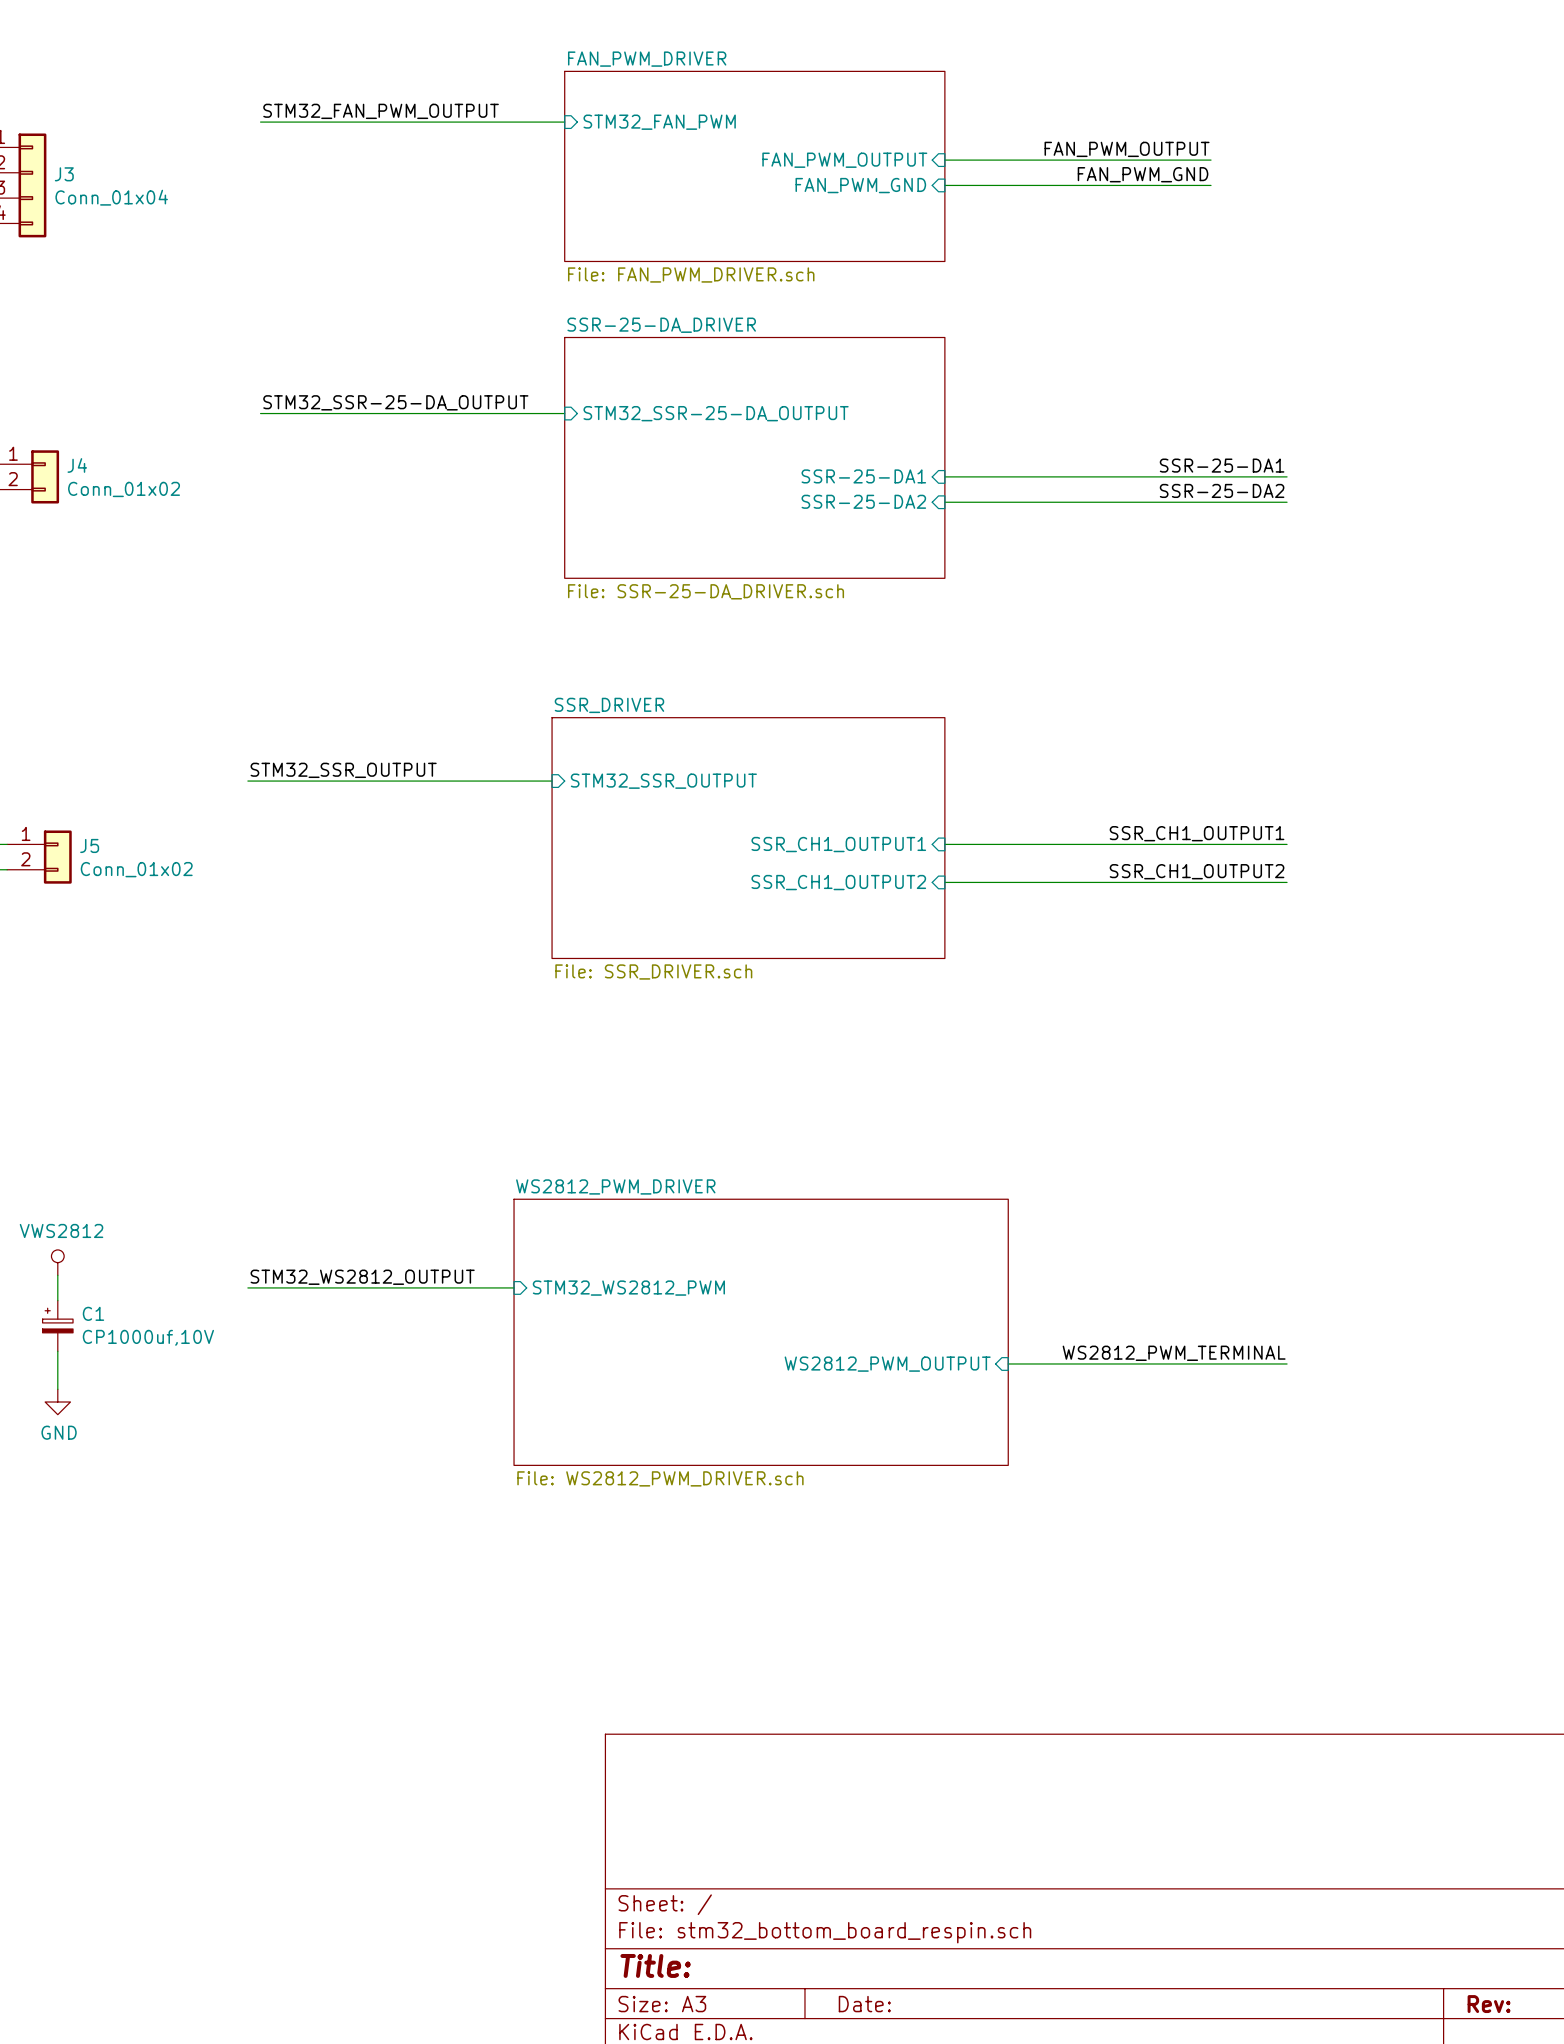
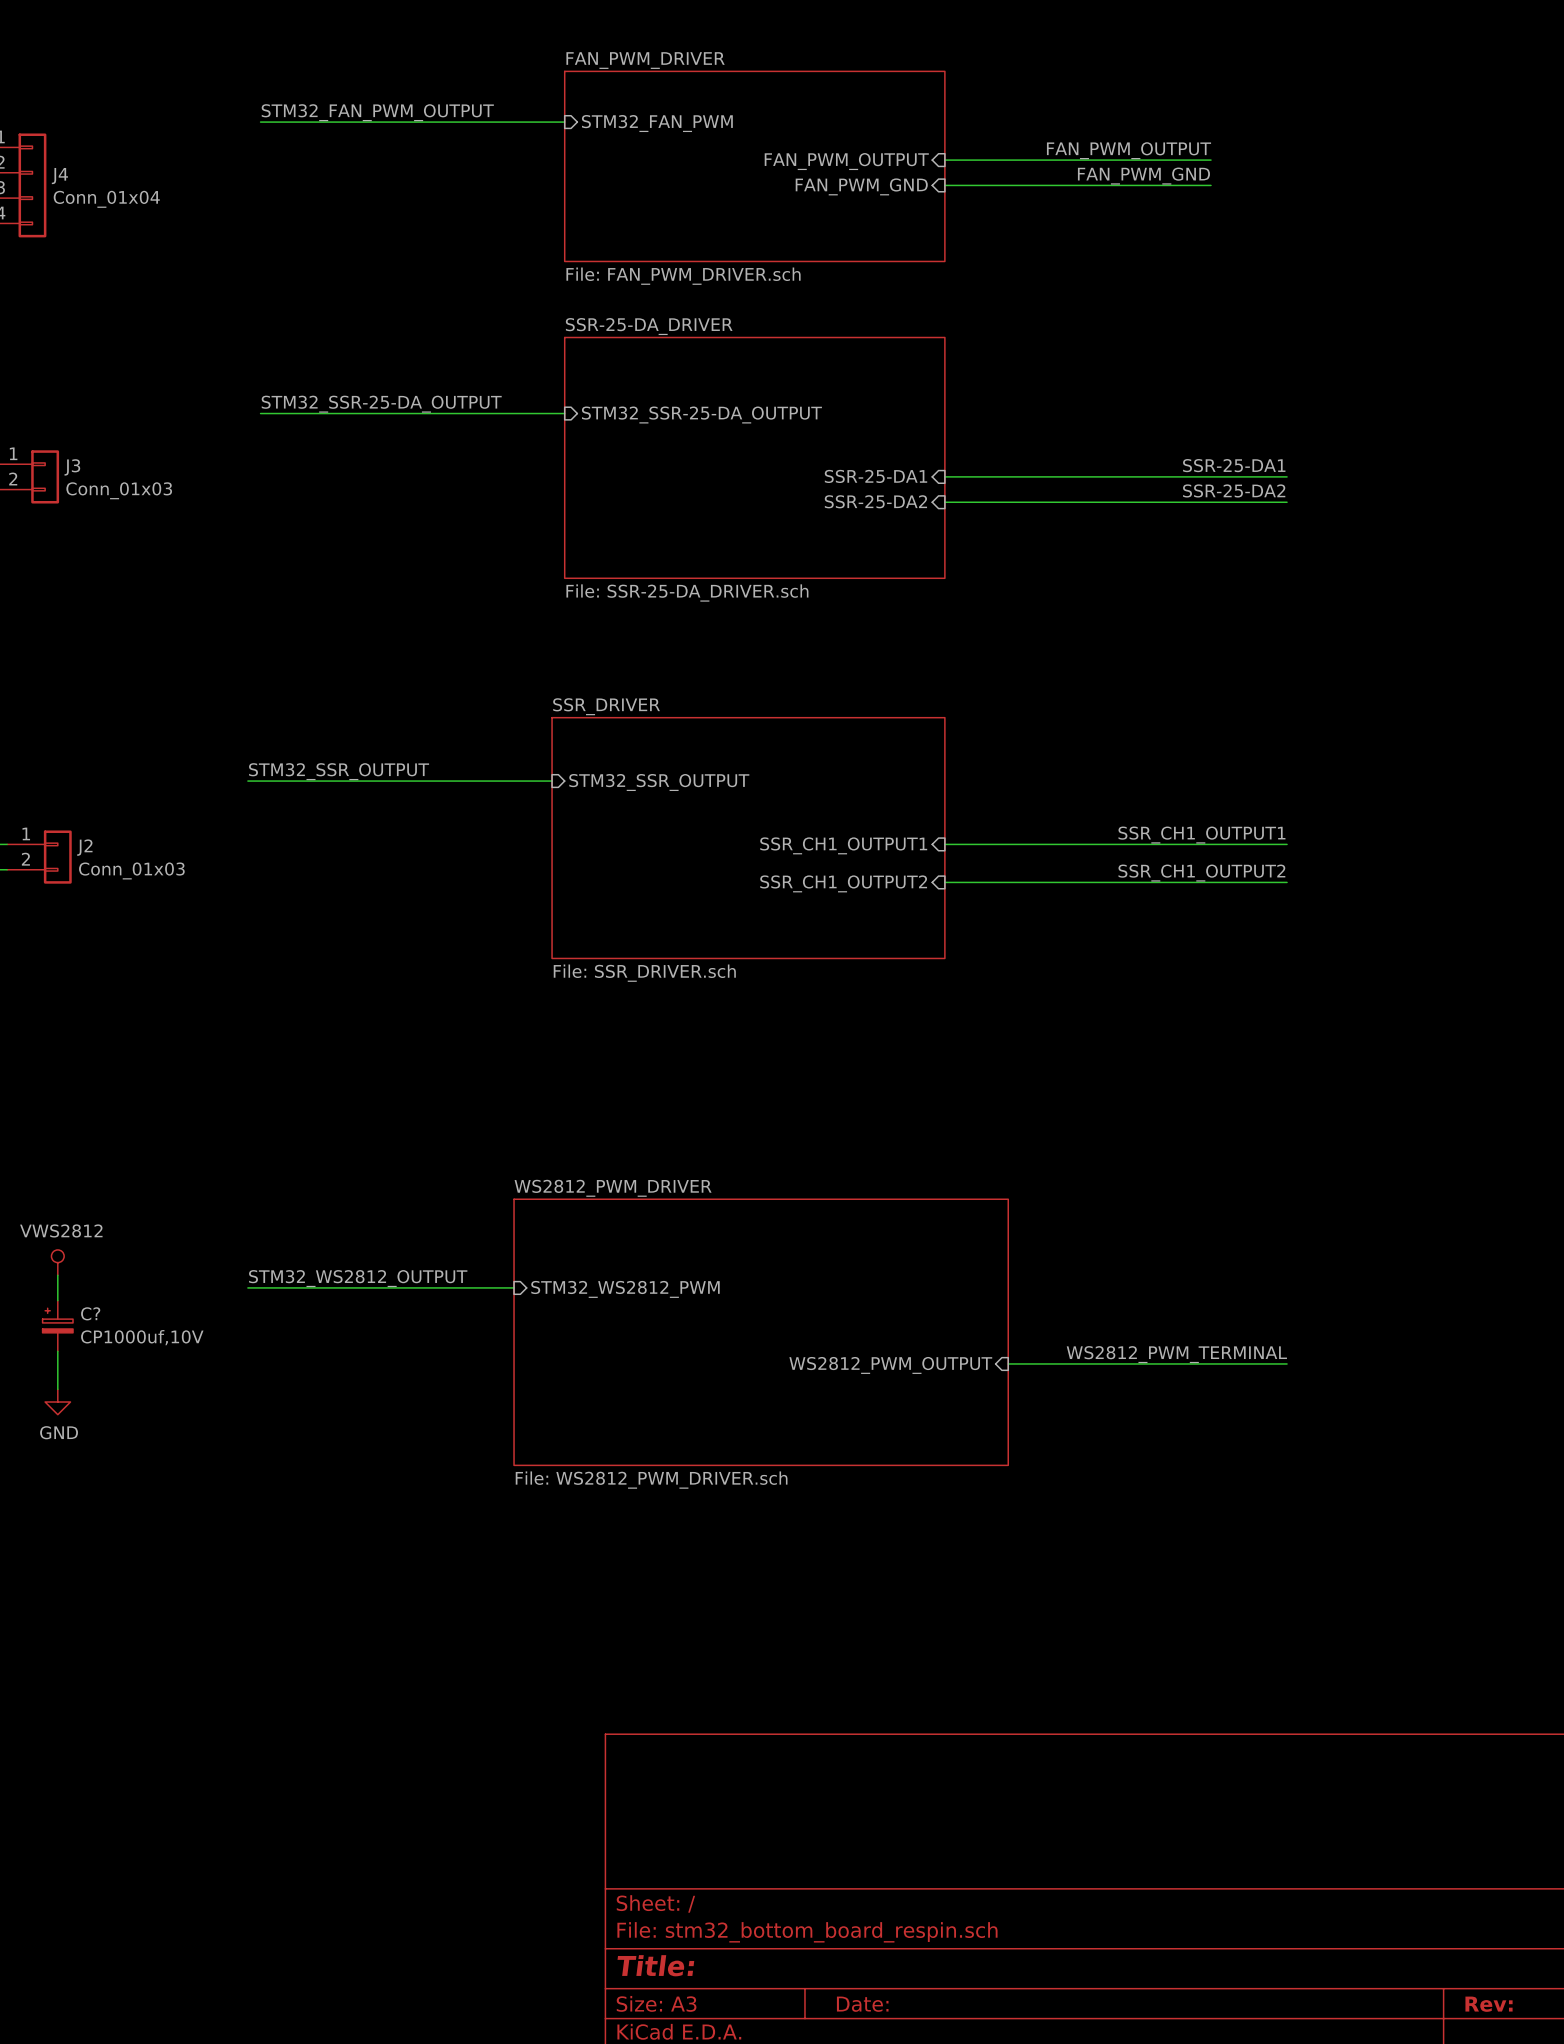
J3 name: J3 (64, 174) -> J4 (59, 176)
J4 name: J4 (77, 465) -> J3 (72, 467)
J4 value: Conn_01x02 (124, 489) -> Conn_01x03 (119, 490)
J5 name: J5 (89, 845) -> J2 (84, 847)
J5 value: Conn_01x02 (136, 869) -> Conn_01x03 (131, 870)
C1 name: C1 (93, 1313) -> C? (90, 1313)

